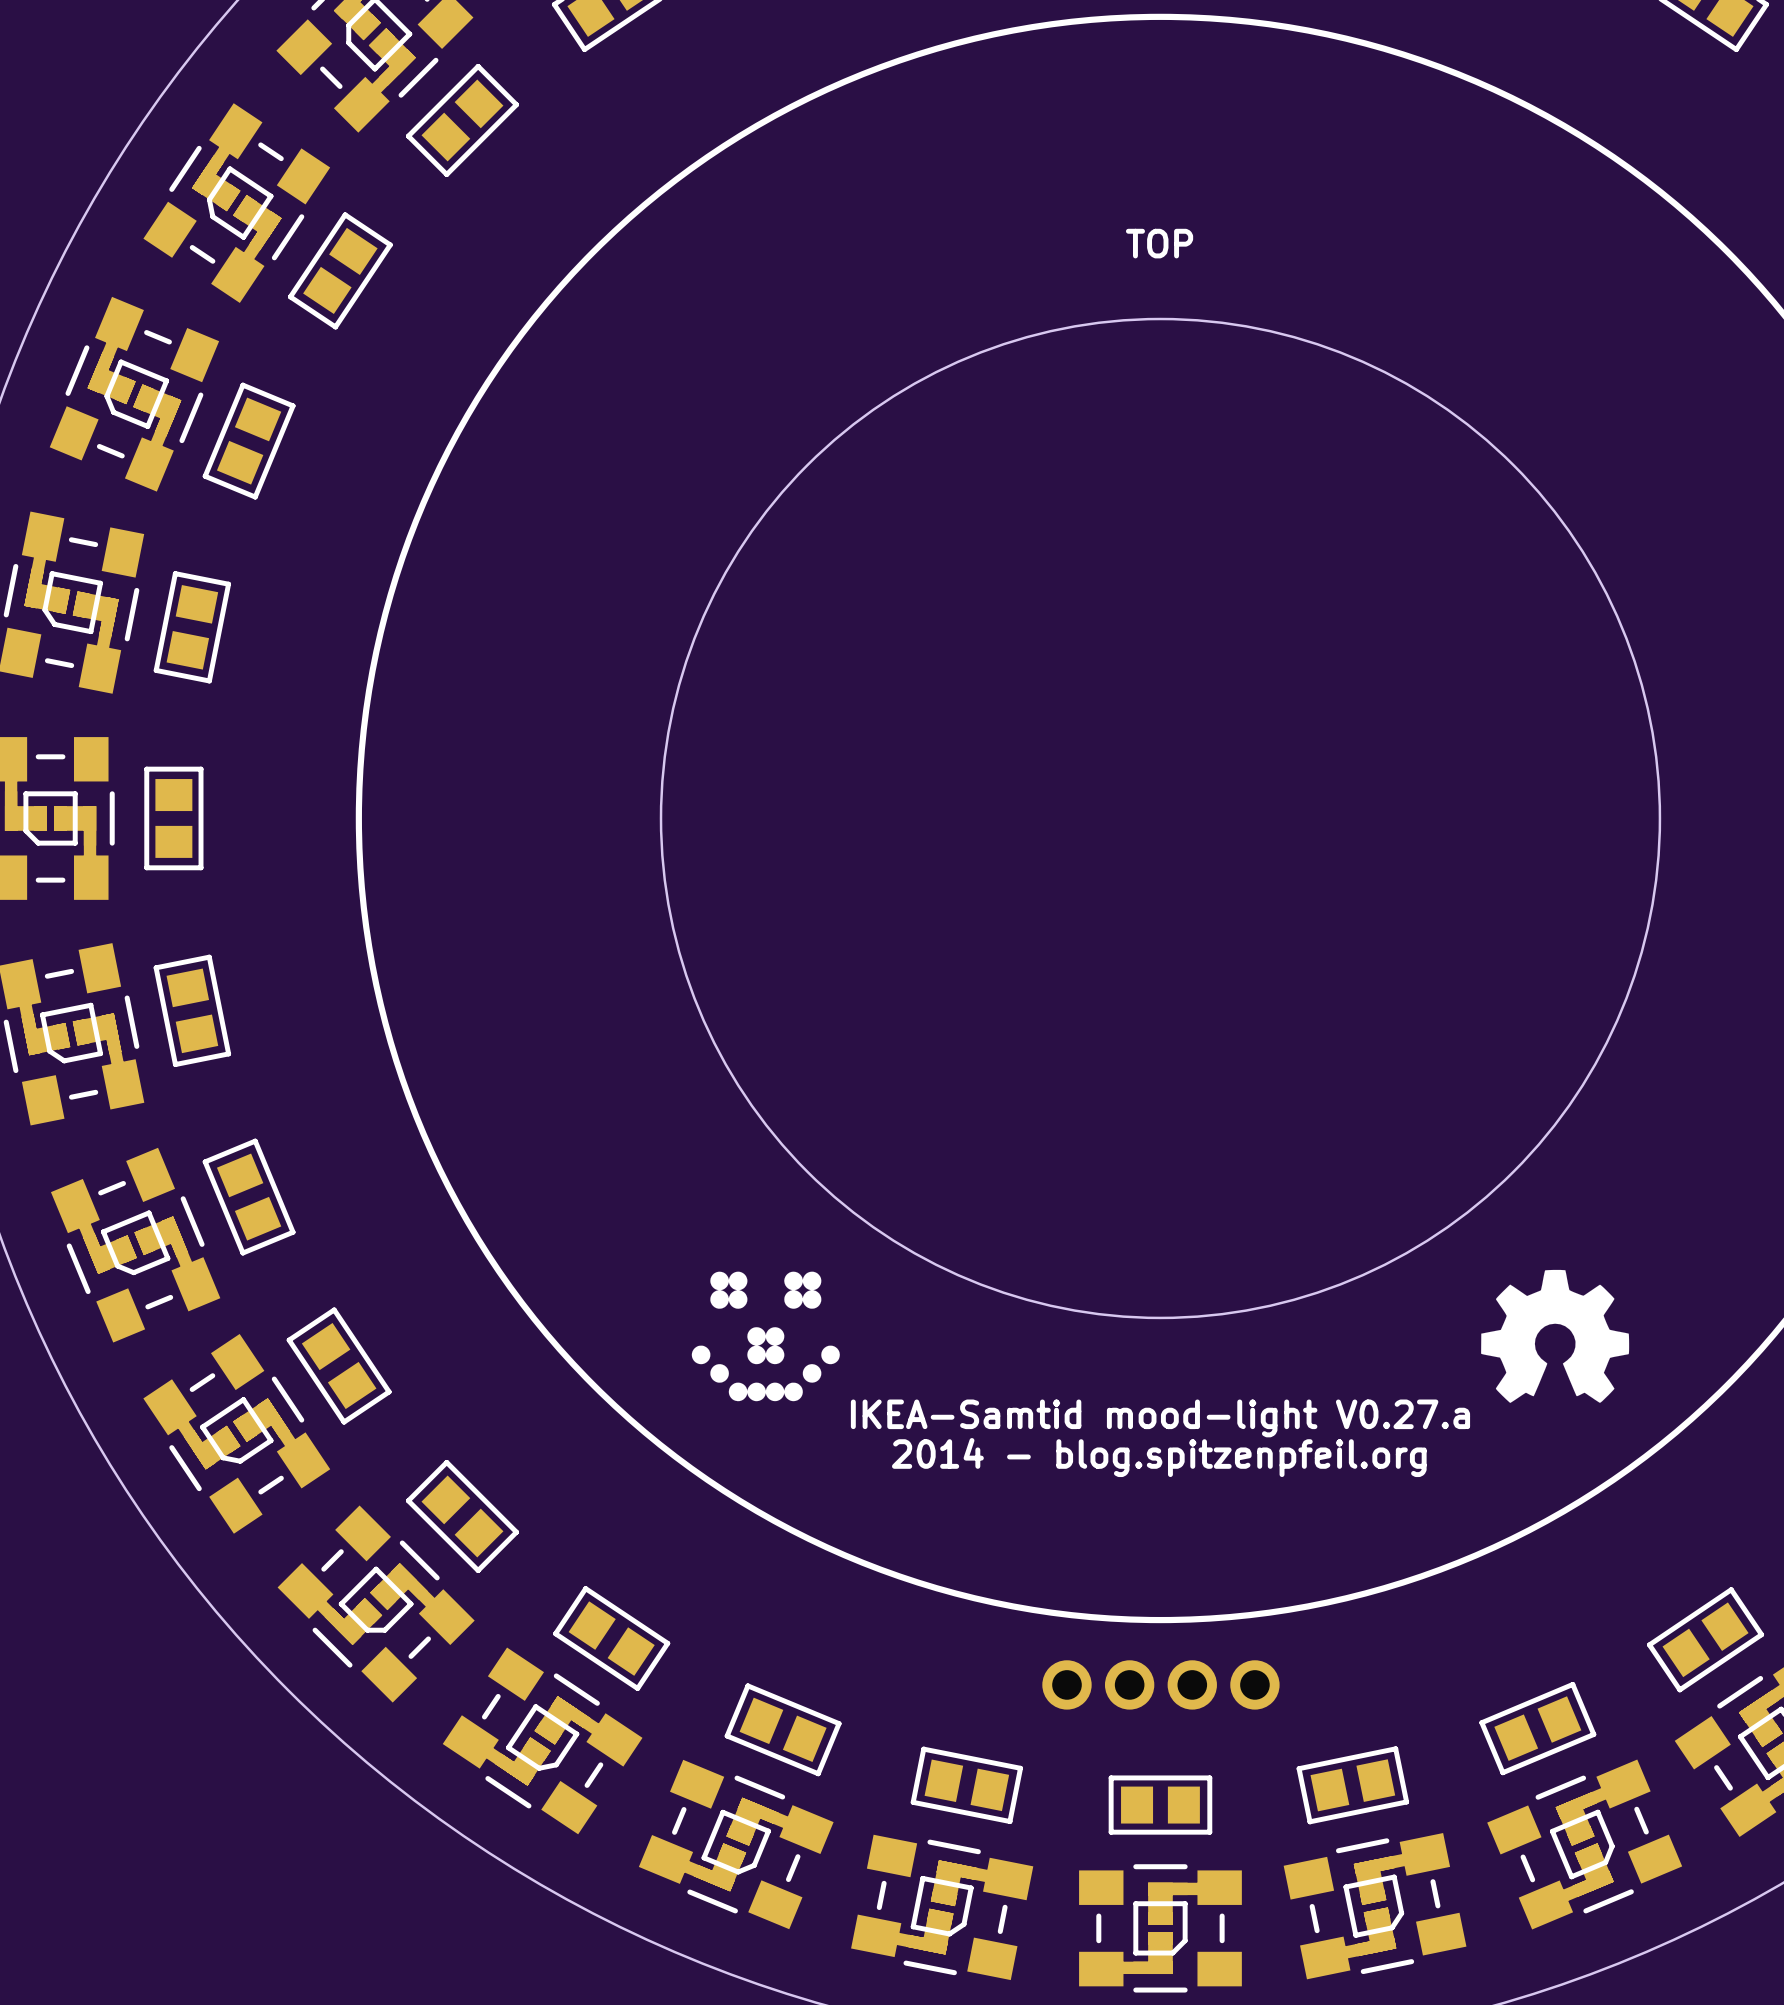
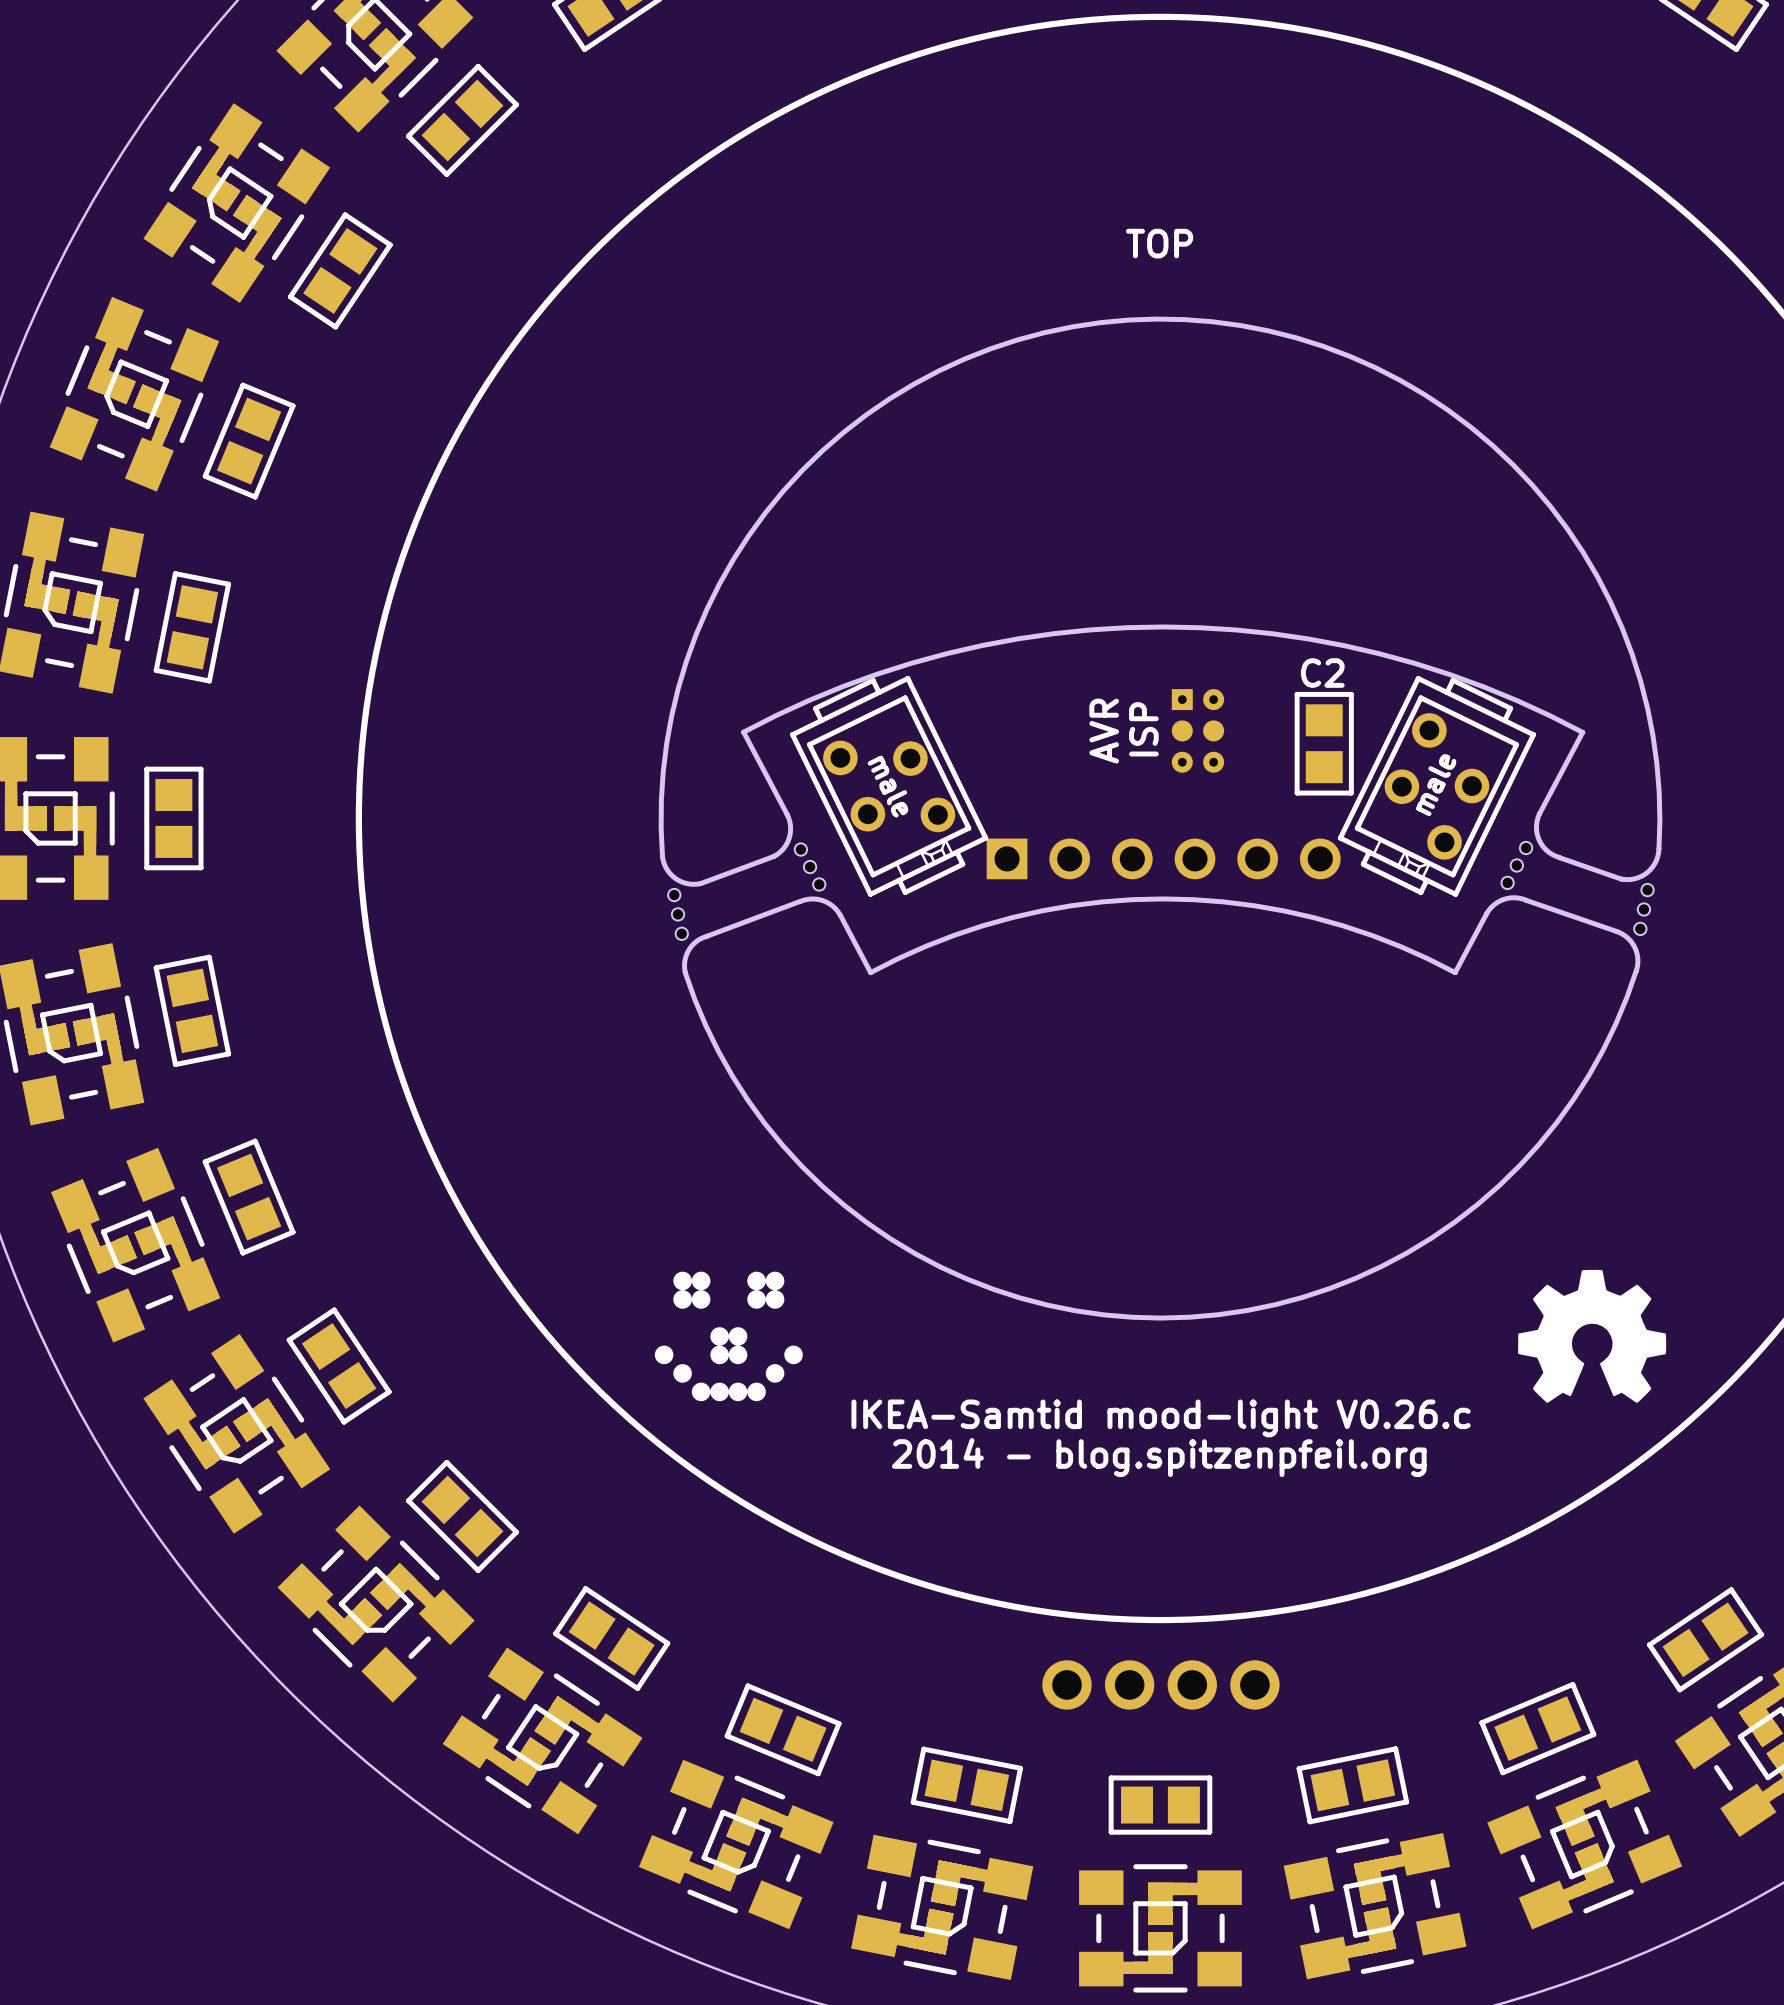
round board edge: [659, 317, 1662, 1320] -> none
text: none -> ISP (1143, 729)
part: none -> (1197, 730)
text: none -> AVR (1104, 731)
C2: none -> (1324, 743)
part: none -> (889, 786)
part: none -> (1436, 786)
board edge: none -> (1539, 813) (1582, 732) (1550, 715) (1483, 686) (1379, 653) (1272, 633) (1163, 626) (1054, 633) (946, 653) (842, 686) (743, 732) (789, 821) (790, 834) (787, 841) (780, 851) (773, 856) (700, 883) (685, 883) (675, 878) (665, 867) (662, 856) (661, 828) (663, 771) (666, 743) (678, 688) (695, 635) (719, 583) (748, 535) (783, 491) (802, 470) (844, 432) (889, 398) (938, 370) (964, 359) (1017, 339) (1072, 326) (1100, 322) (1156, 319) (1212, 321) (1268, 330) (1322, 346) (1349, 356) (1400, 380) (1448, 410) (1492, 445) (1532, 484) (1567, 529) (1597, 576) (1621, 627) (1632, 654) (1647, 708) (1656, 763) (1659, 820) (1659, 848)
board edge: none -> (1539, 813) (1536, 829) (1539, 840) (1545, 849) (1559, 857)
board edge: none -> (1658, 849) (1656, 860) (1650, 870) (1640, 876) (1629, 879) (1621, 879) (1559, 857)
part: none -> (1163, 858)
part: none -> (1516, 865)
part: none -> (810, 867)
board edge: none -> (1526, 900) (1507, 898) (1491, 907) (1455, 972) (1400, 946) (1371, 935) (1313, 917) (1284, 910) (1223, 901) (1162, 898) (1102, 901) (1071, 905) (1012, 917) (954, 935) (897, 958) (870, 972) (840, 915)
board edge: none -> (1526, 900) (1620, 933) (1630, 940) (1637, 955) (1636, 971) (1615, 1024) (1589, 1074) (1557, 1122) (1519, 1165) (1499, 1185) (1455, 1221) (1407, 1252) (1356, 1278) (1302, 1297) (1246, 1310) (1189, 1317) (1132, 1317) (1104, 1314) (1047, 1305) (1020, 1297) (966, 1278) (940, 1266) (890, 1238) (866, 1222) (844, 1205) (802, 1166) (782, 1145) (747, 1100) (718, 1051) (705, 1025) (685, 972)
board edge: none -> (800, 901) (700, 939) (687, 953) (685, 972)
board edge: none -> (800, 901) (811, 898) (823, 900) (833, 906) (840, 915)
part: none -> (1643, 909)
part: none -> (678, 914)
drawing position: (765, 1336) -> (728, 1336)
drawing position: (1555, 1336) -> (1592, 1336)
text: IKEA-Samtid mood-light V0.27.a (1160, 1418) -> IKEA-Samtid mood-light V0.26.c (1161, 1418)

